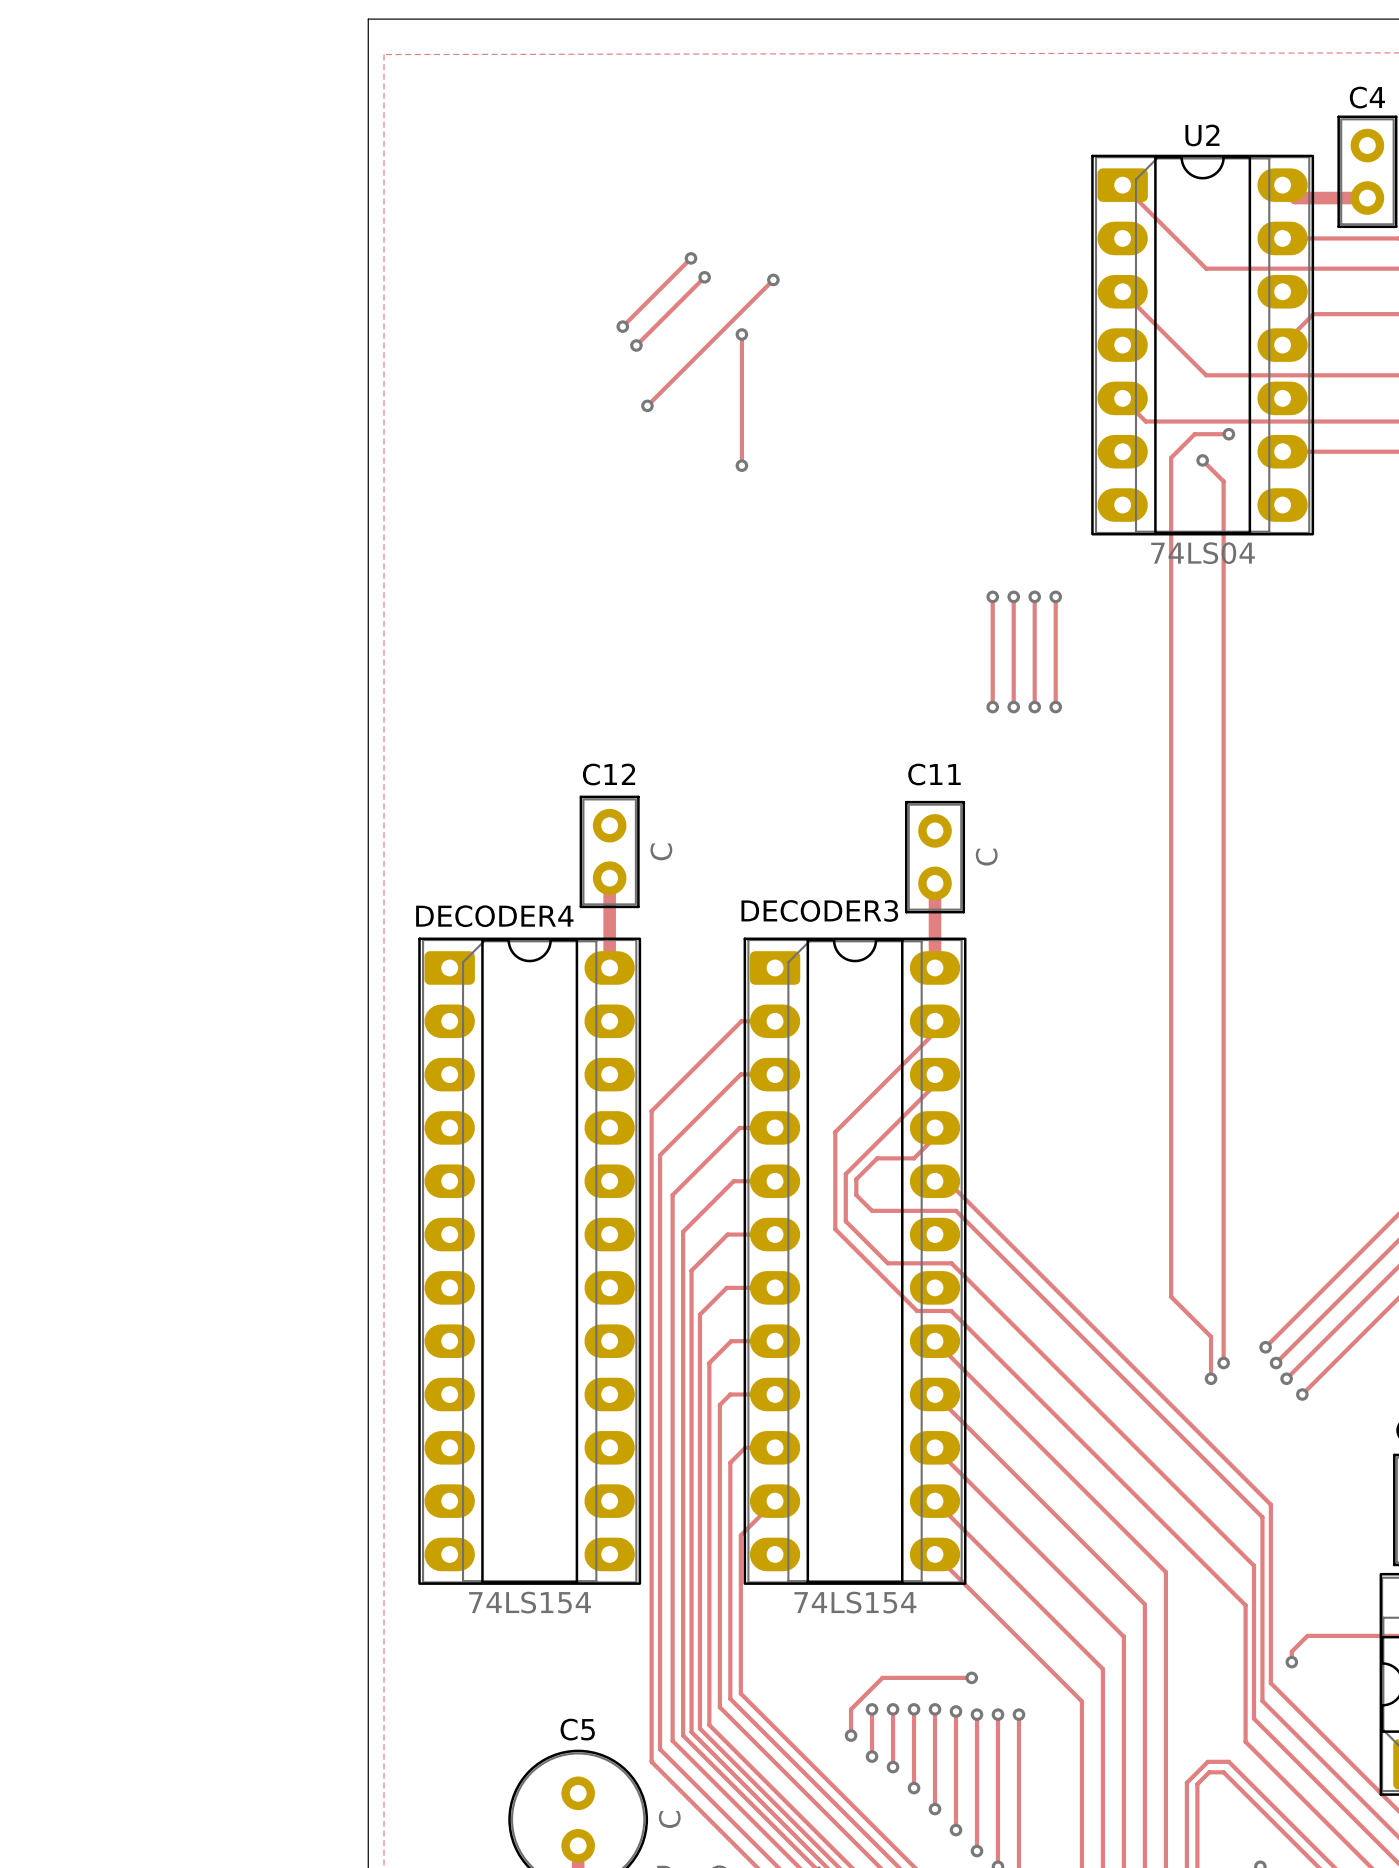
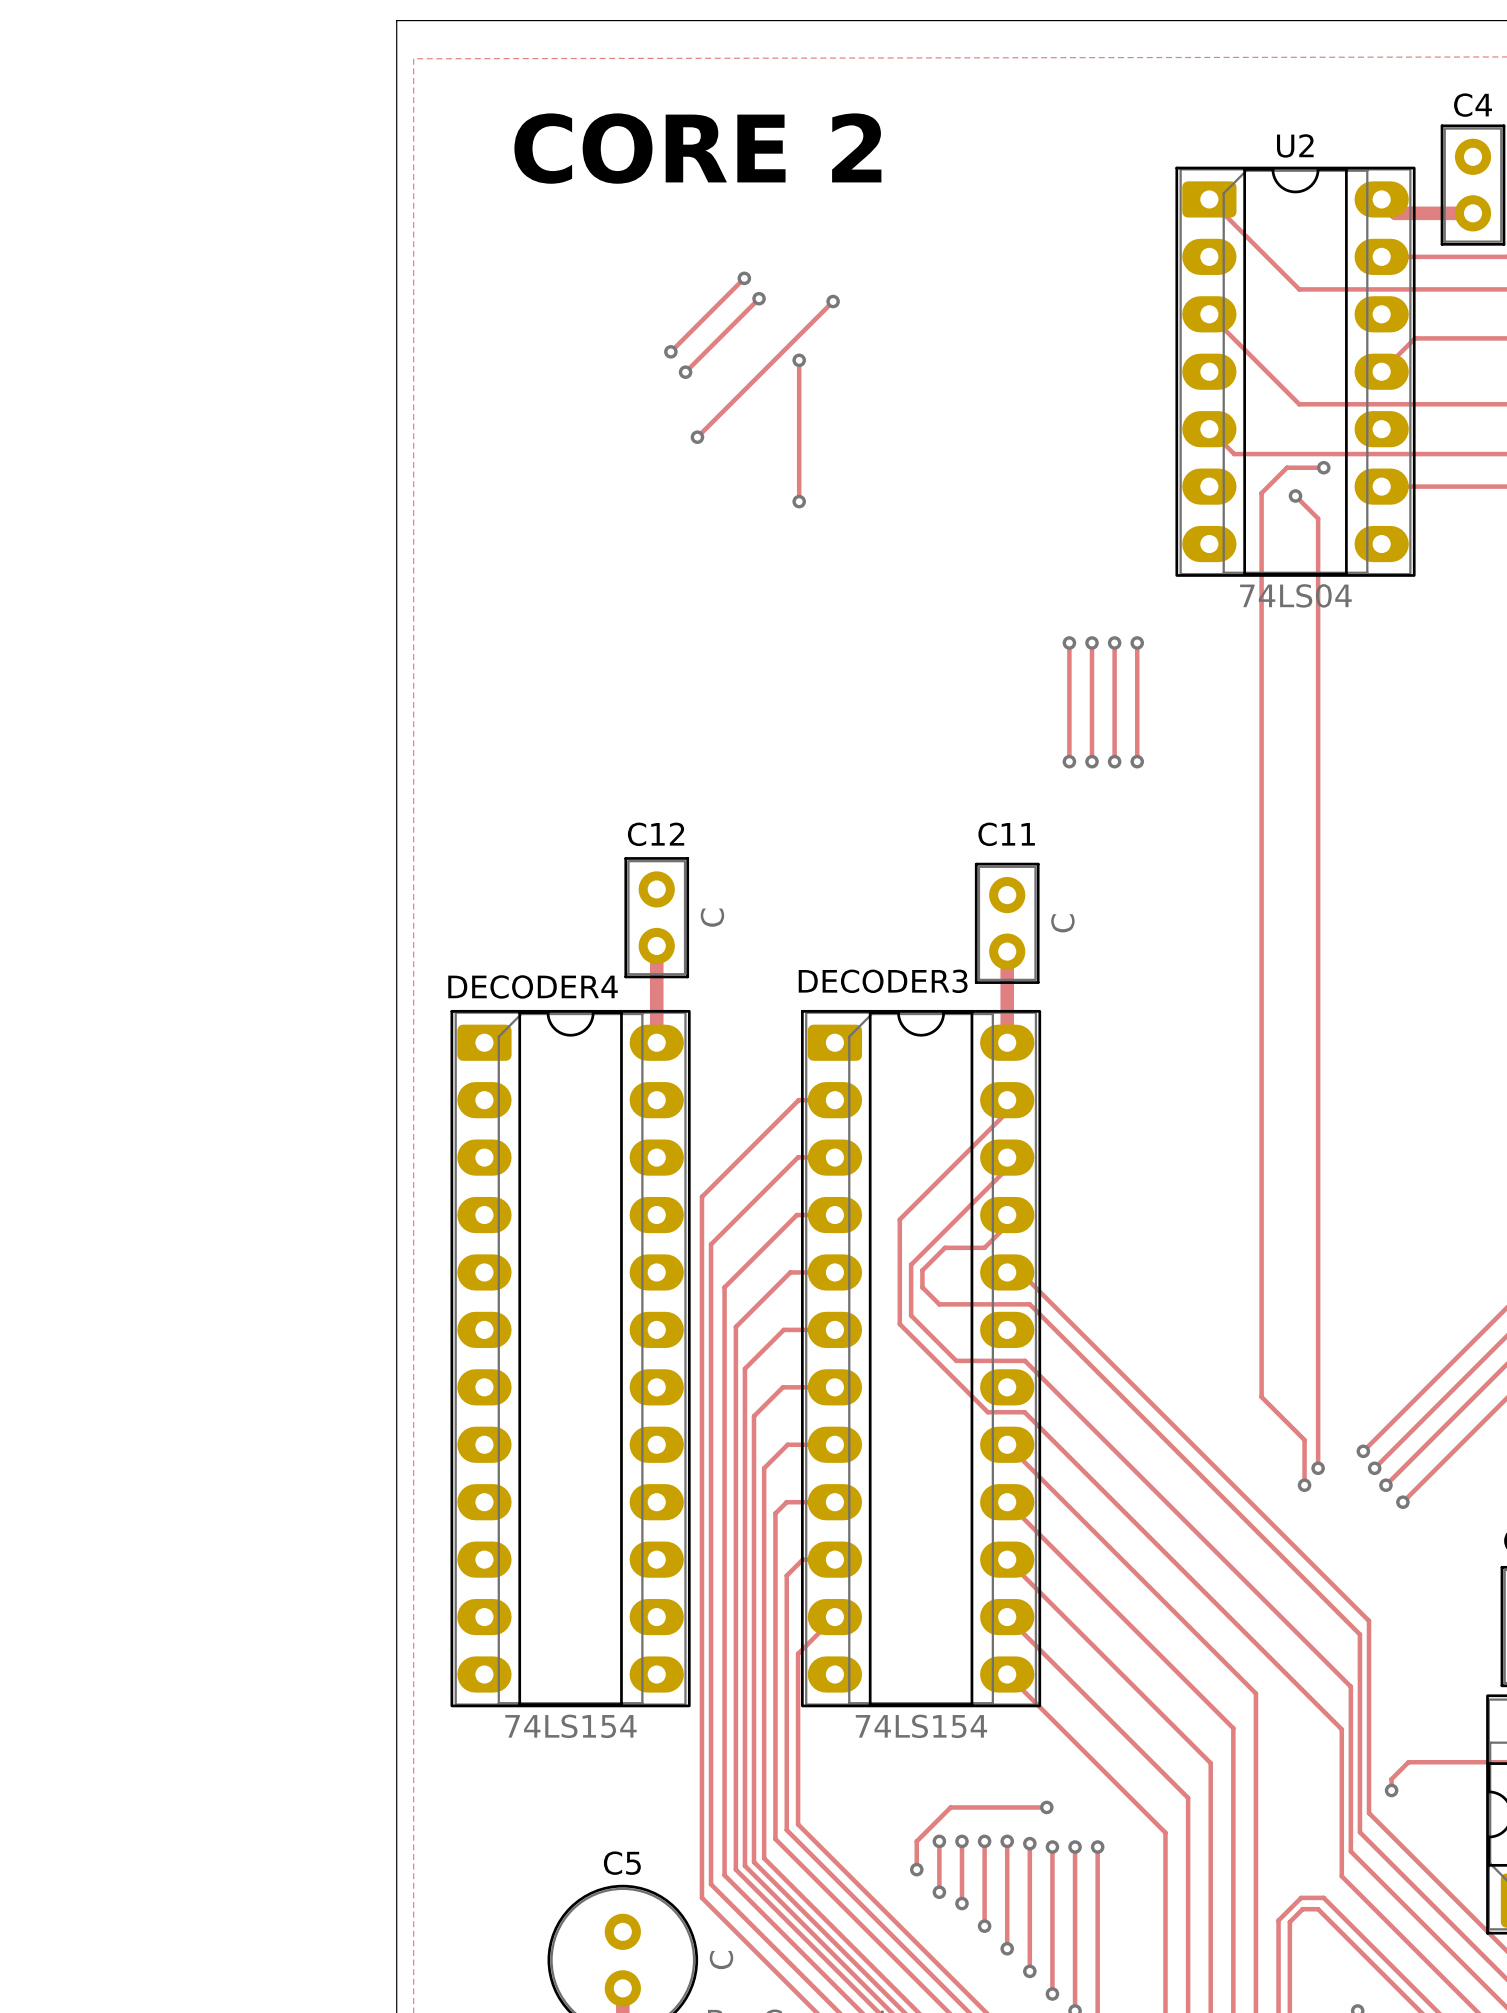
text: none -> CORE 2 (697, 148)

